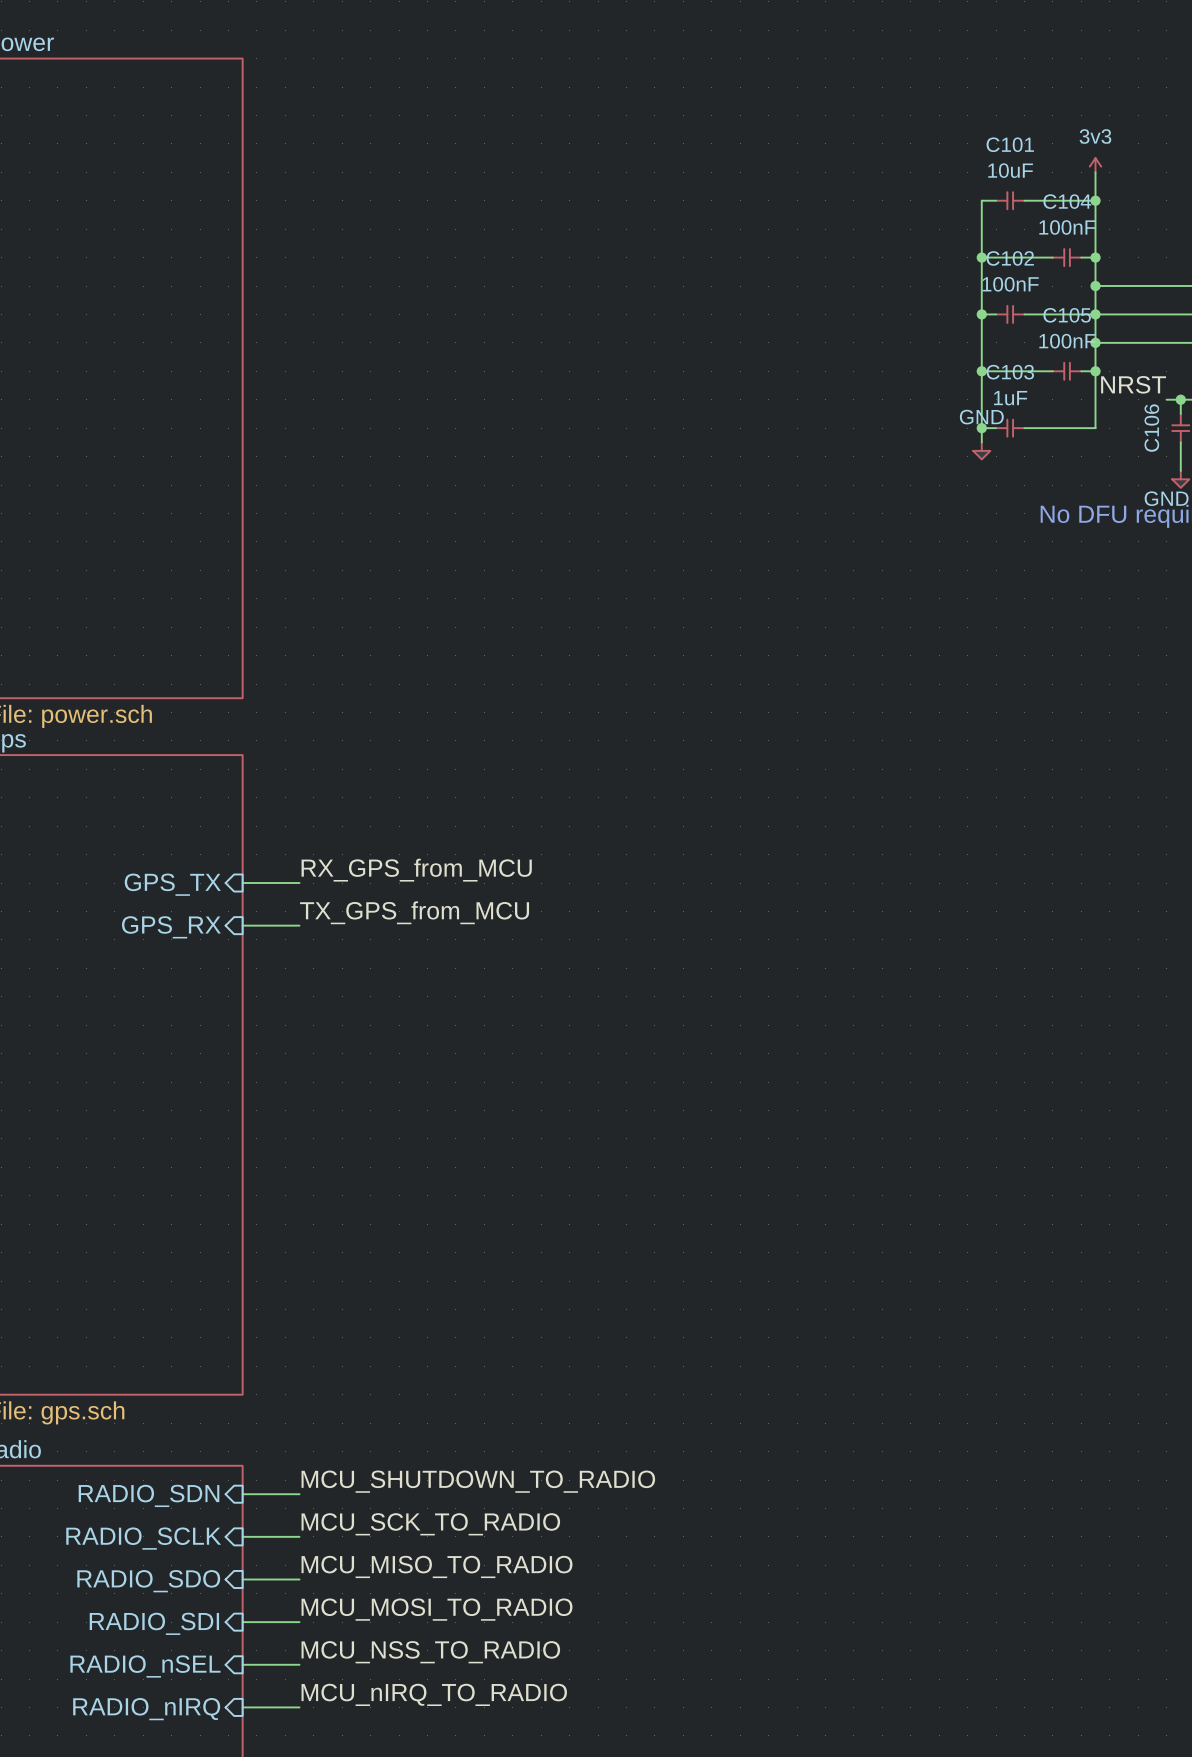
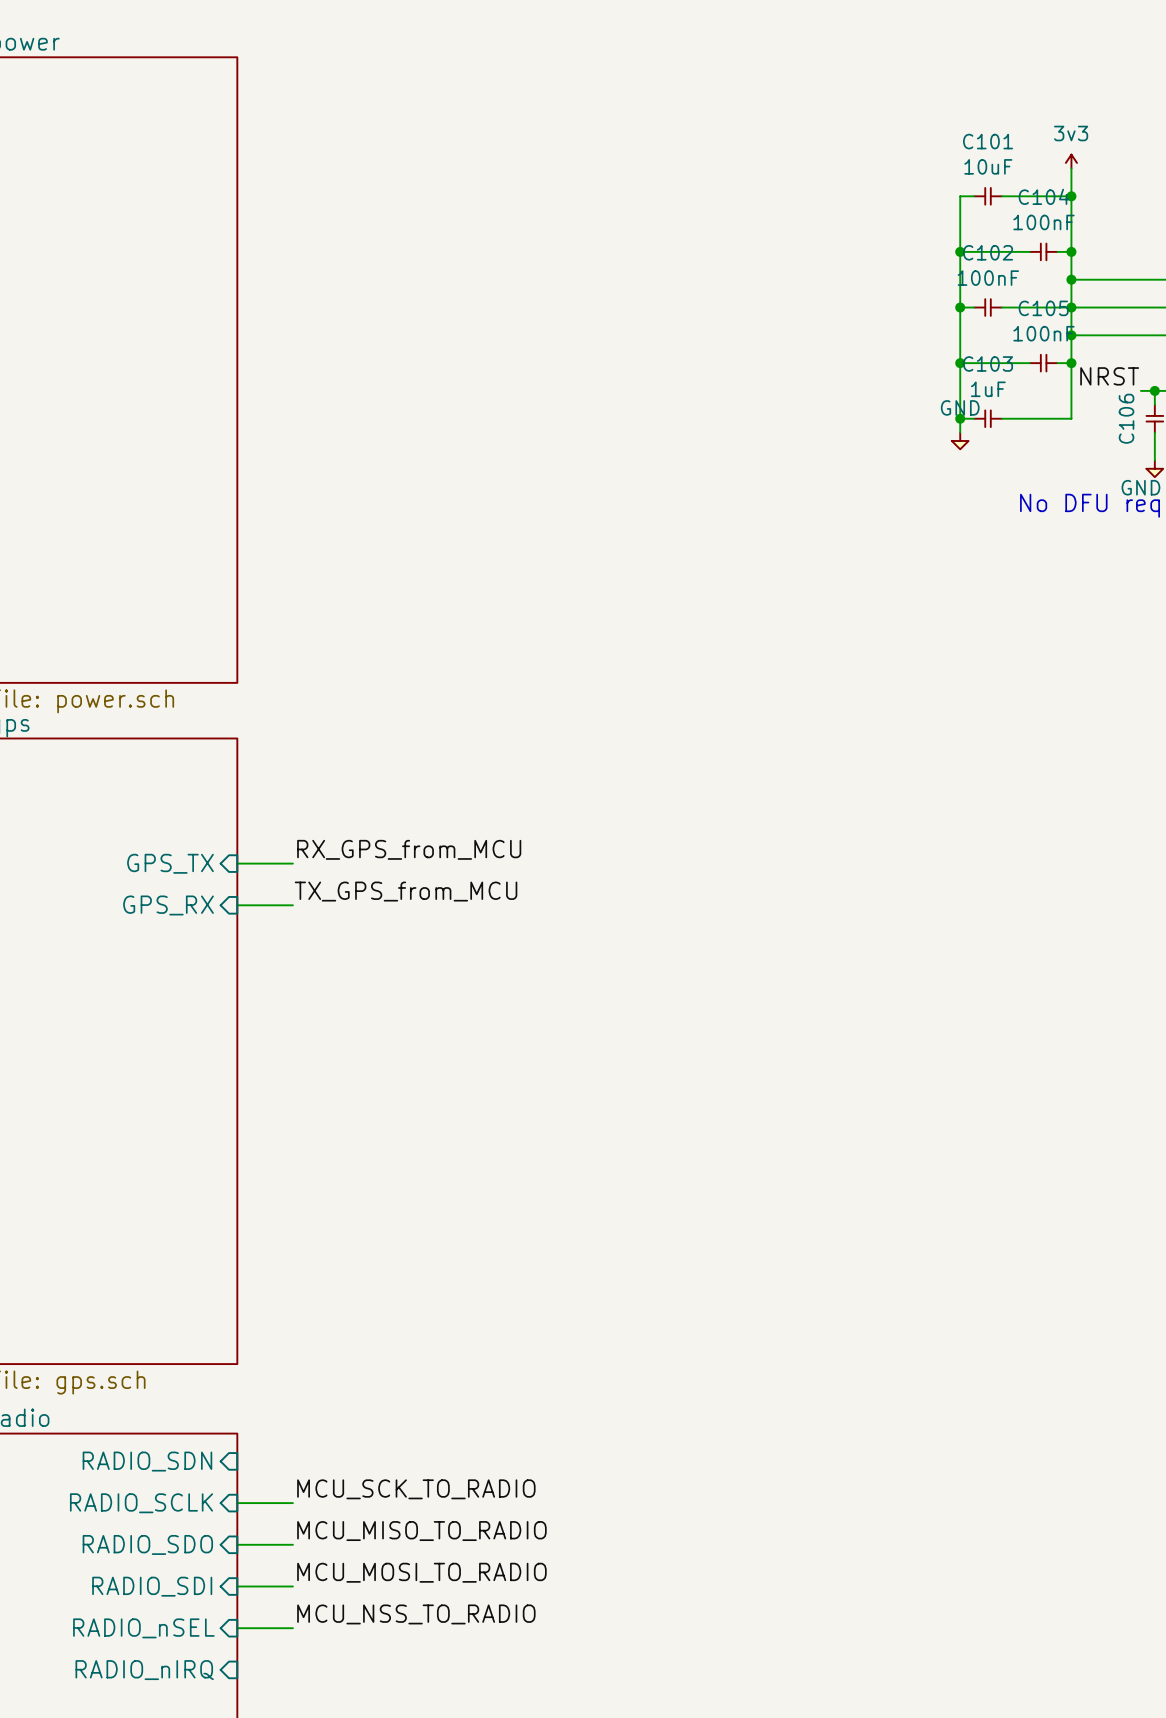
label: MCU_SHUTDOWN_TO_RADIO (478, 1481) -> none
wire: (242, 1494) (299, 1494) -> none
label: MCU_nIRQ_TO_RADIO (434, 1694) -> none
wire: (242, 1707) (299, 1707) -> none

